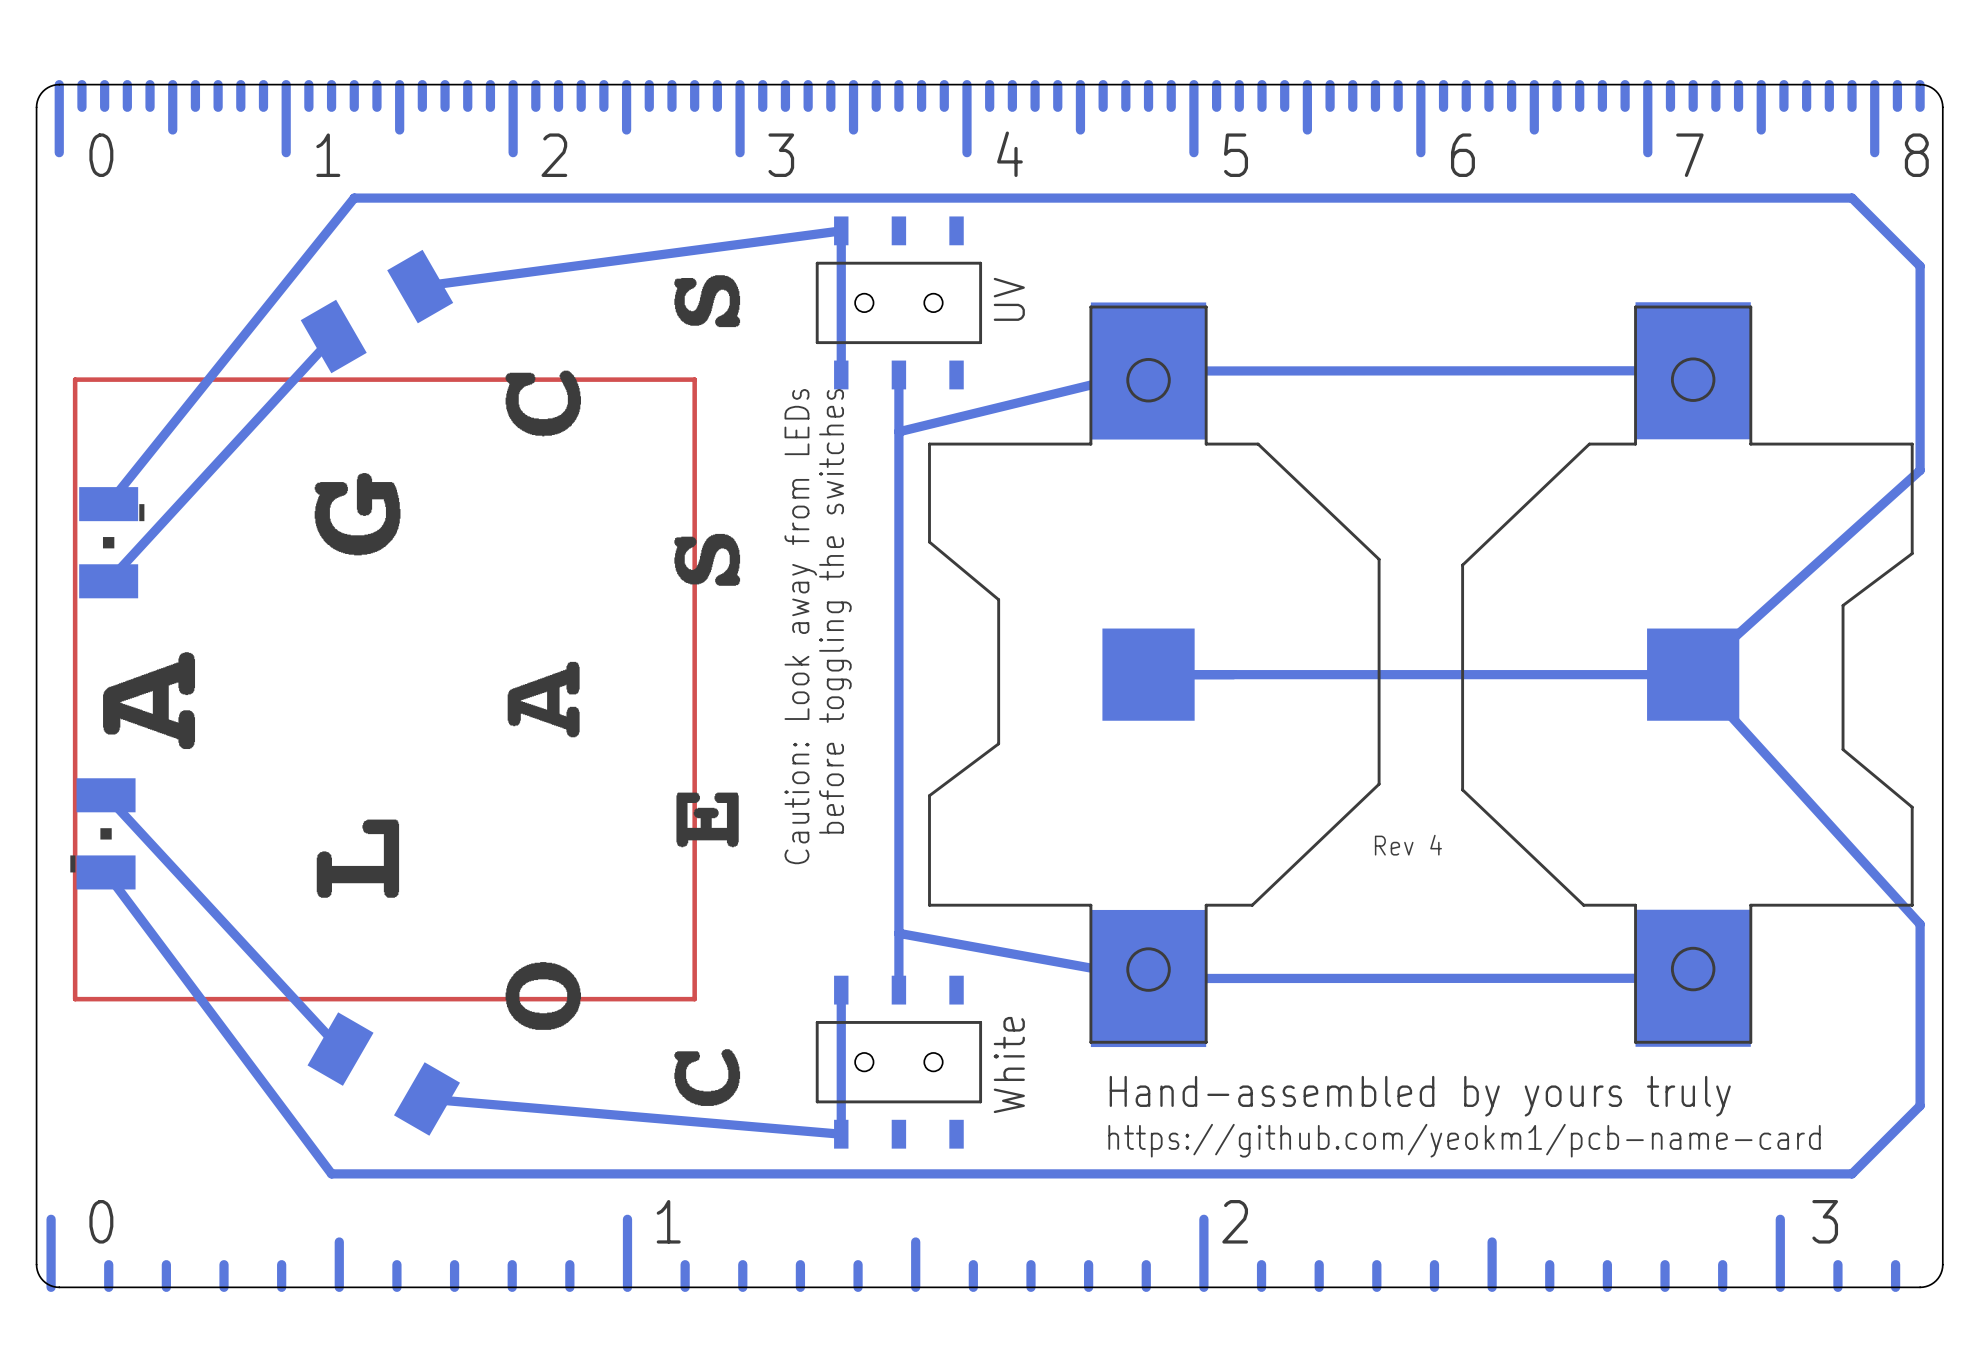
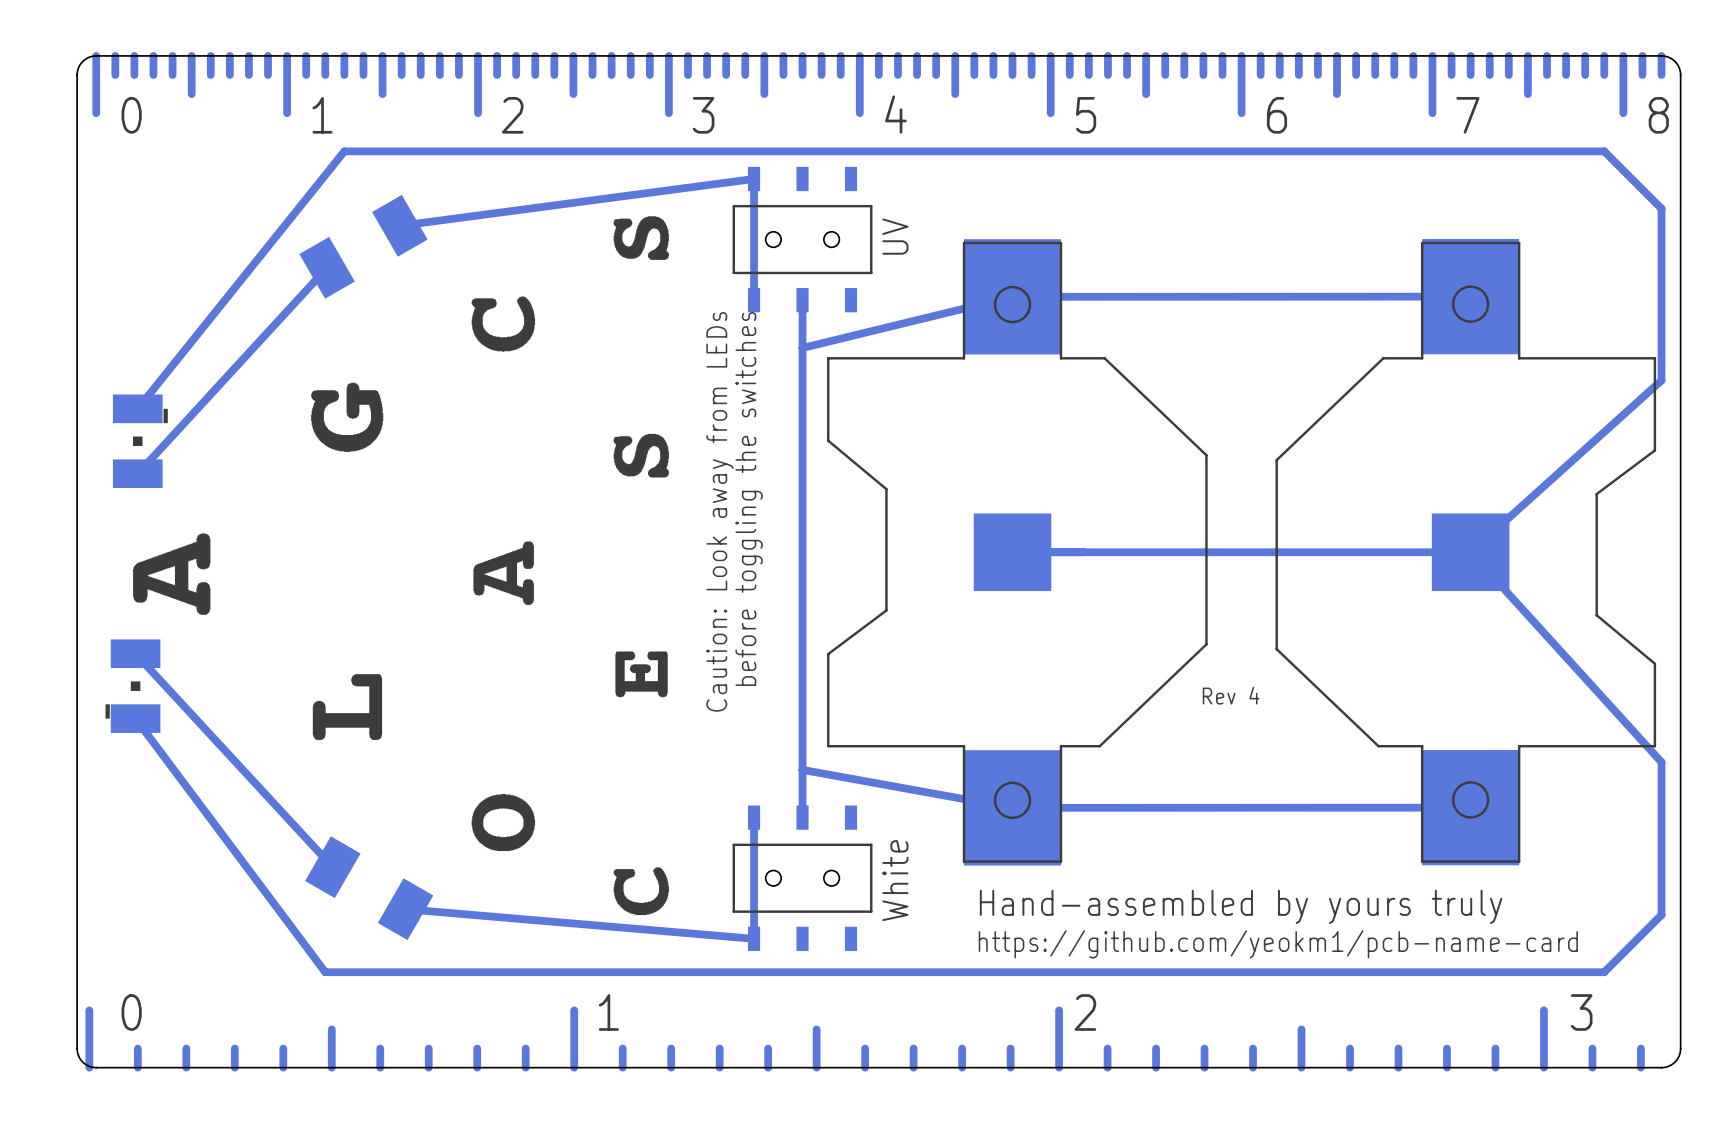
top track: (694, 379) (75, 379) (75, 999) (694, 999) (694, 379) -> none

